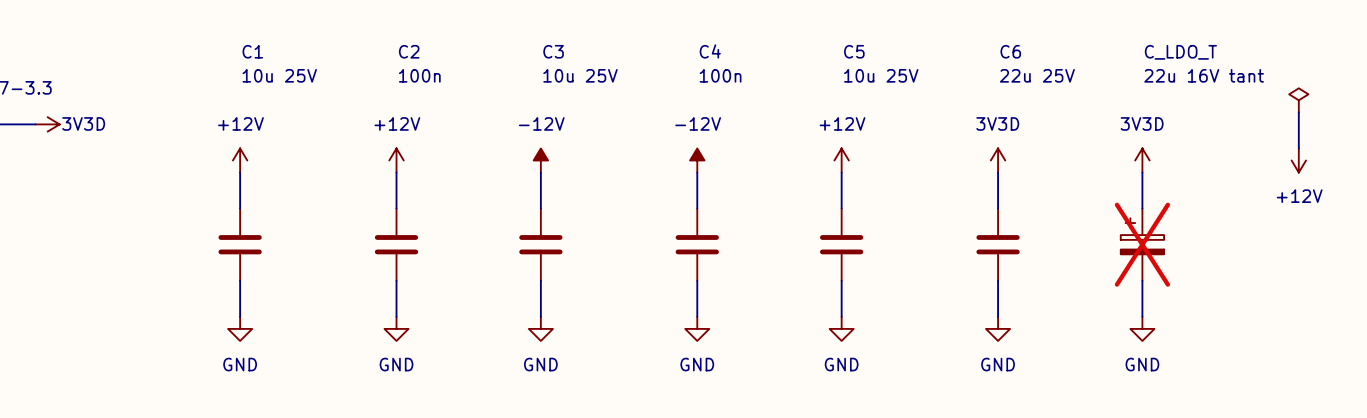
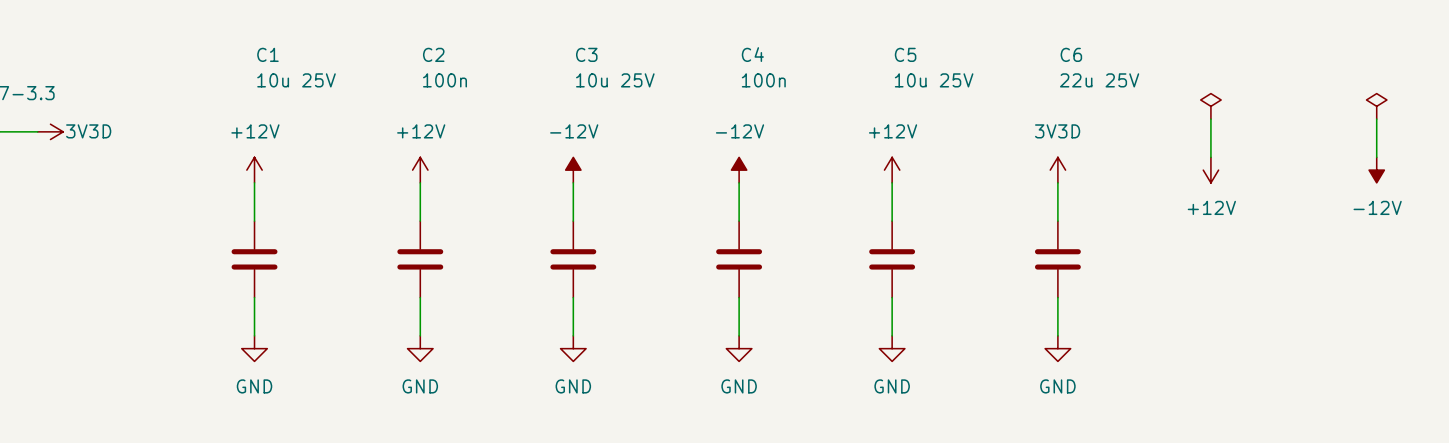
power symbol: none -> (1210, 106)
power symbol: 3V3D (1142, 160) -> +12V (1210, 170)
power symbol: +12V (1298, 160) -> -12V (1376, 170)
wire: (1142, 172) (1142, 208) -> (1210, 119) (1210, 157)
C_LDO_T: 22u 16V tant (1142, 244) -> none
wire: (1142, 280) (1142, 316) -> none
power symbol: GND (1142, 328) -> none

